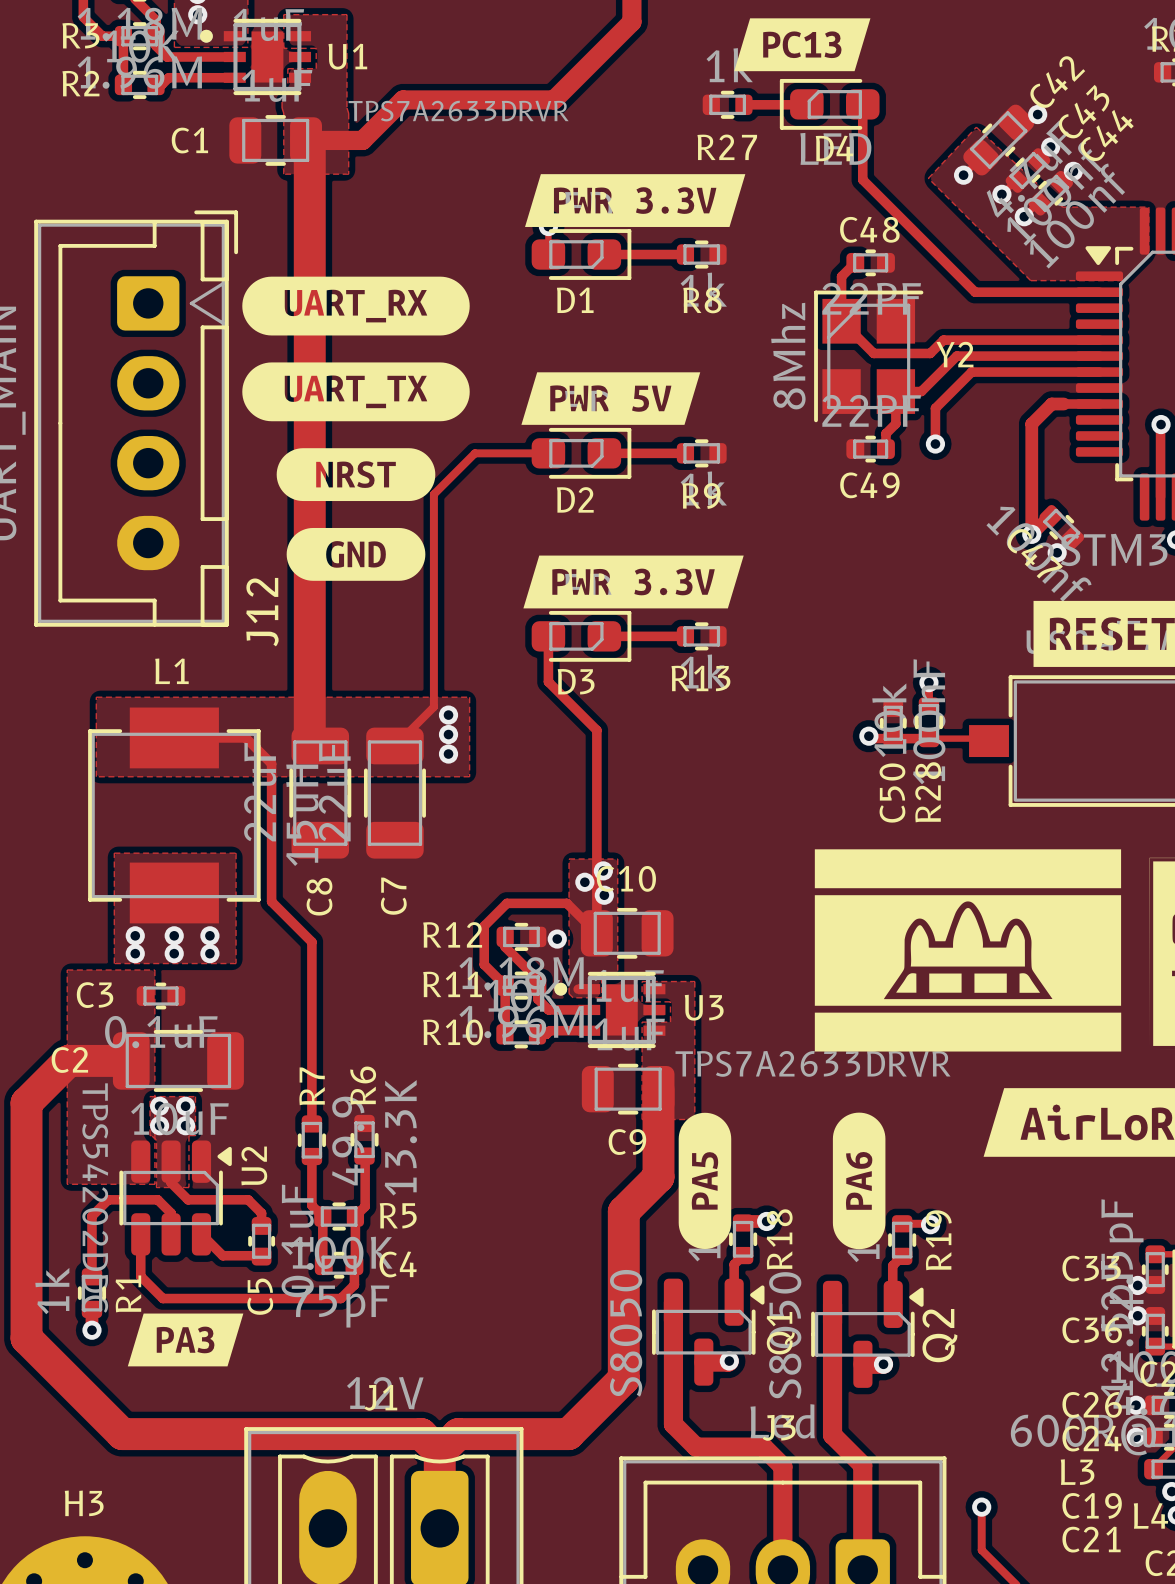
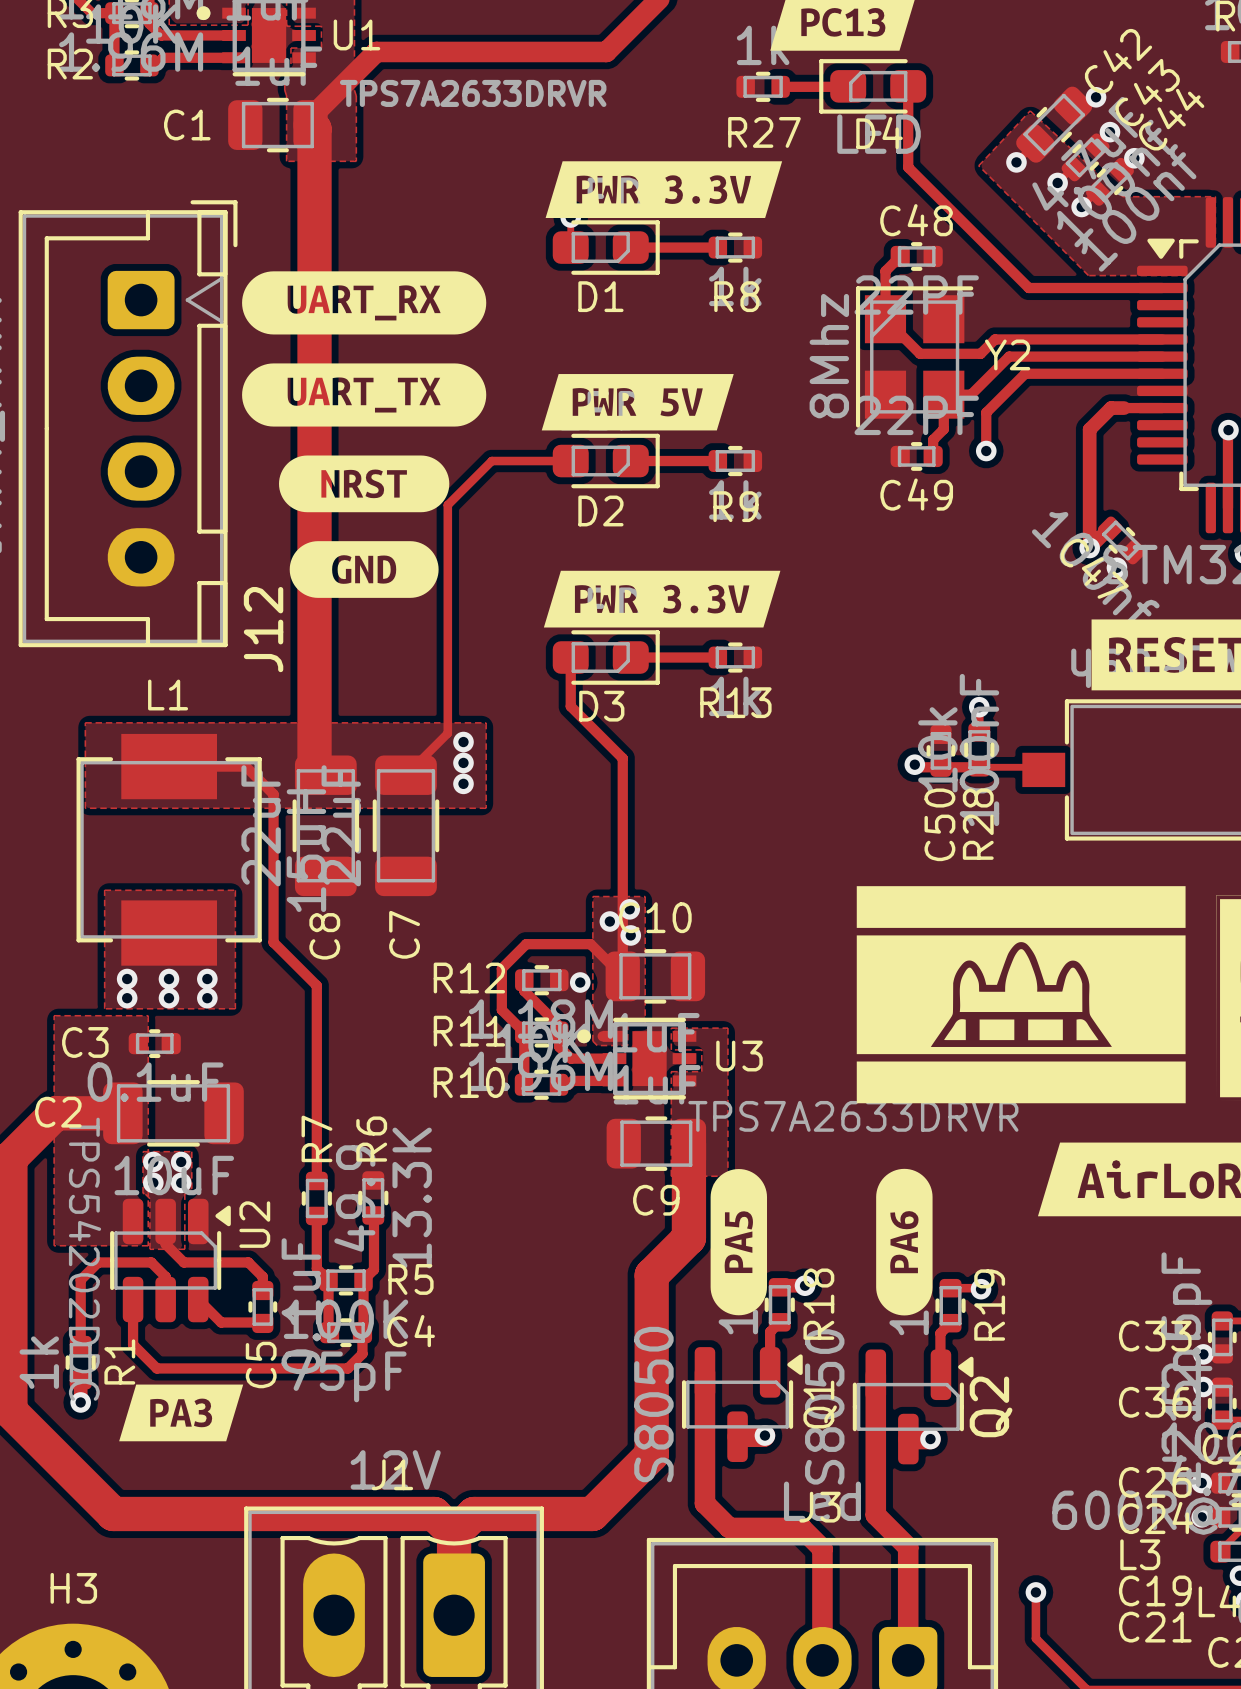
track: (581, 72) (554, 99) (403, 99) (362, 140) (306, 140) -> (606, 51) (376, 51) (310, 117) (310, 125)

